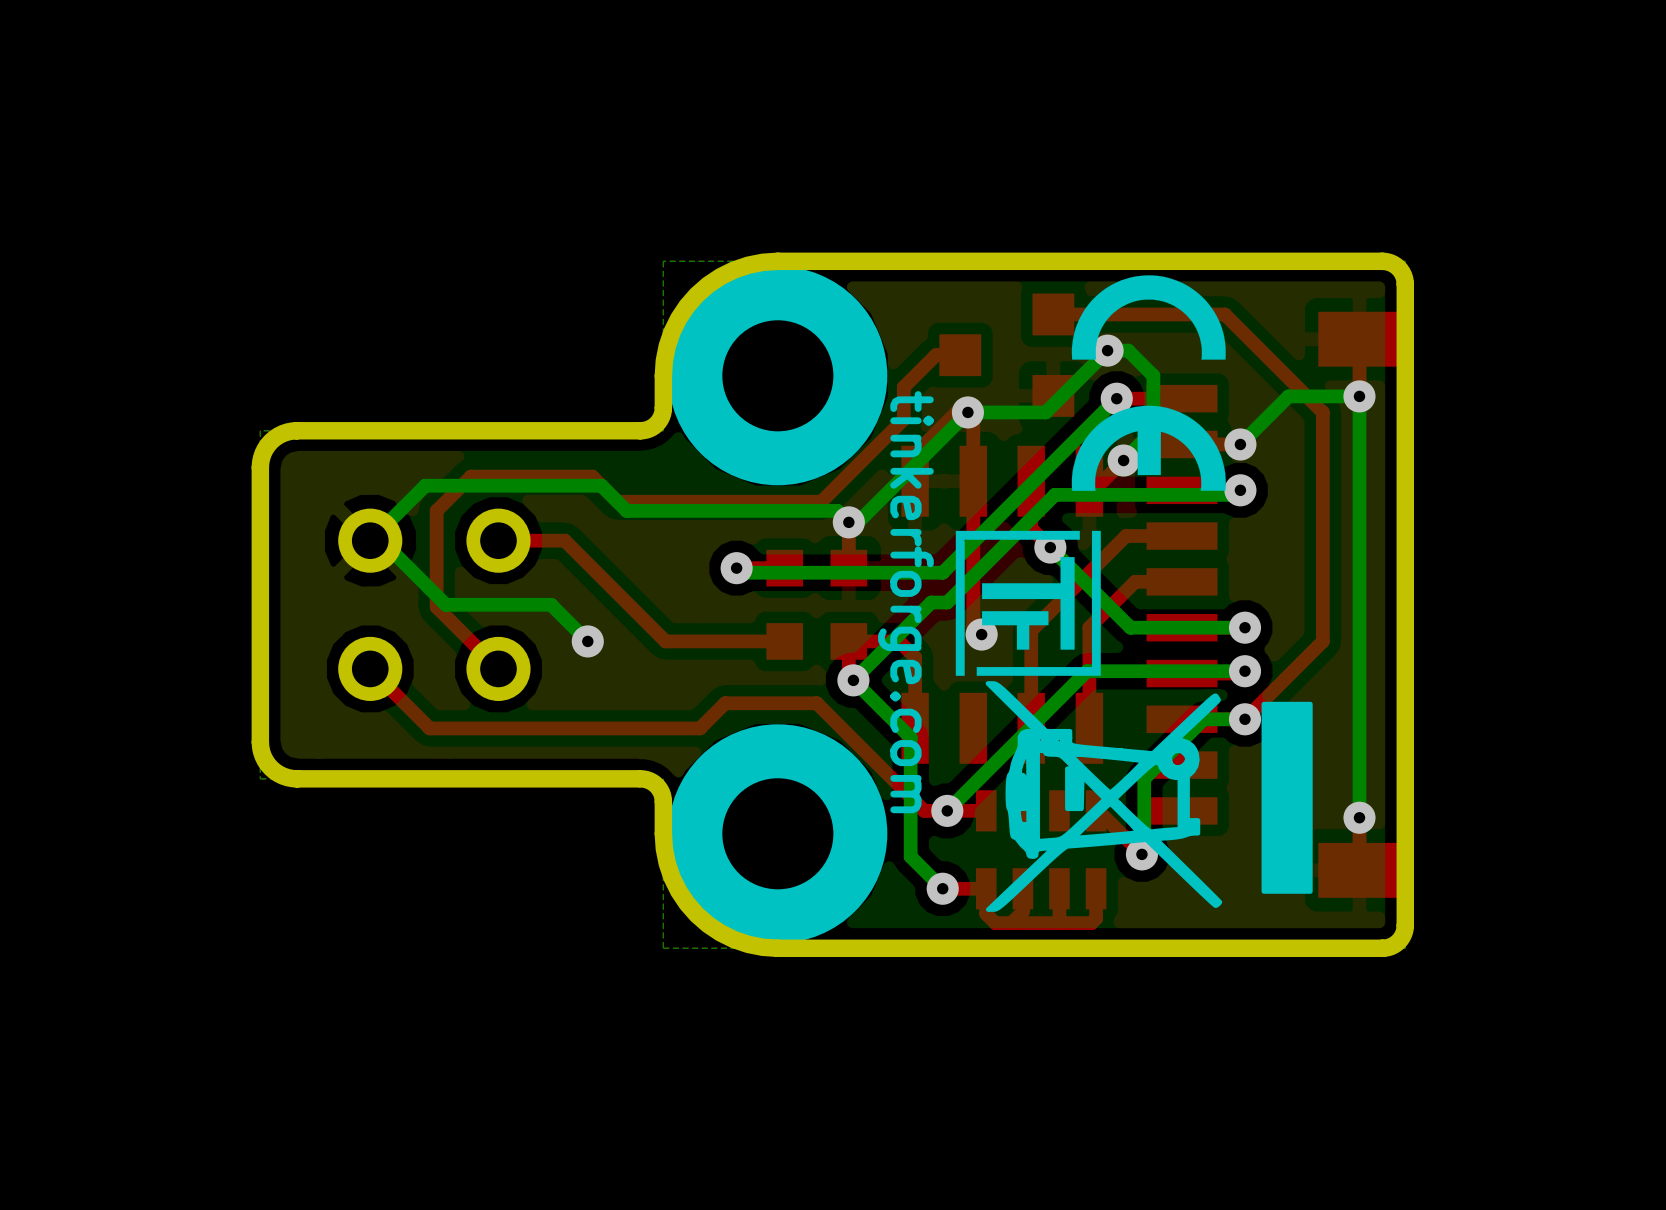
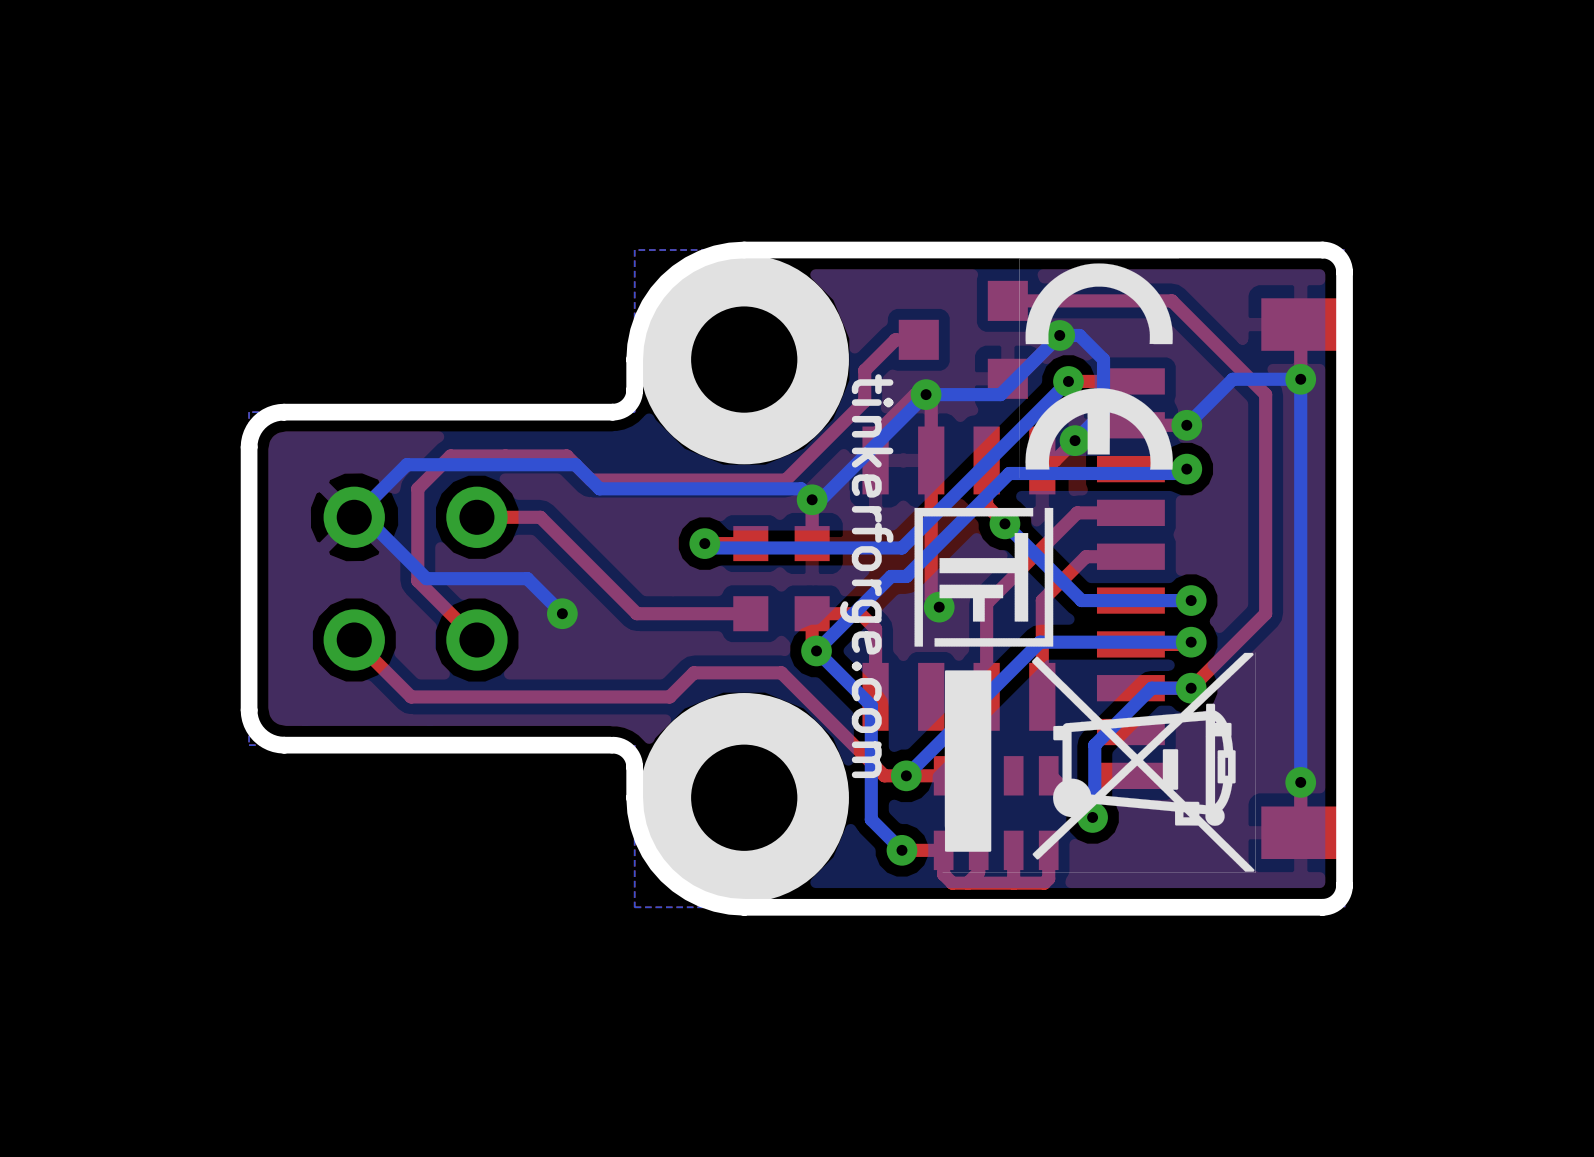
drawing shape: [1071, 275, 1226, 491] -> [1019, 258, 1180, 478]
drawing shape: [985, 681, 1313, 912] -> [942, 652, 1256, 873]

